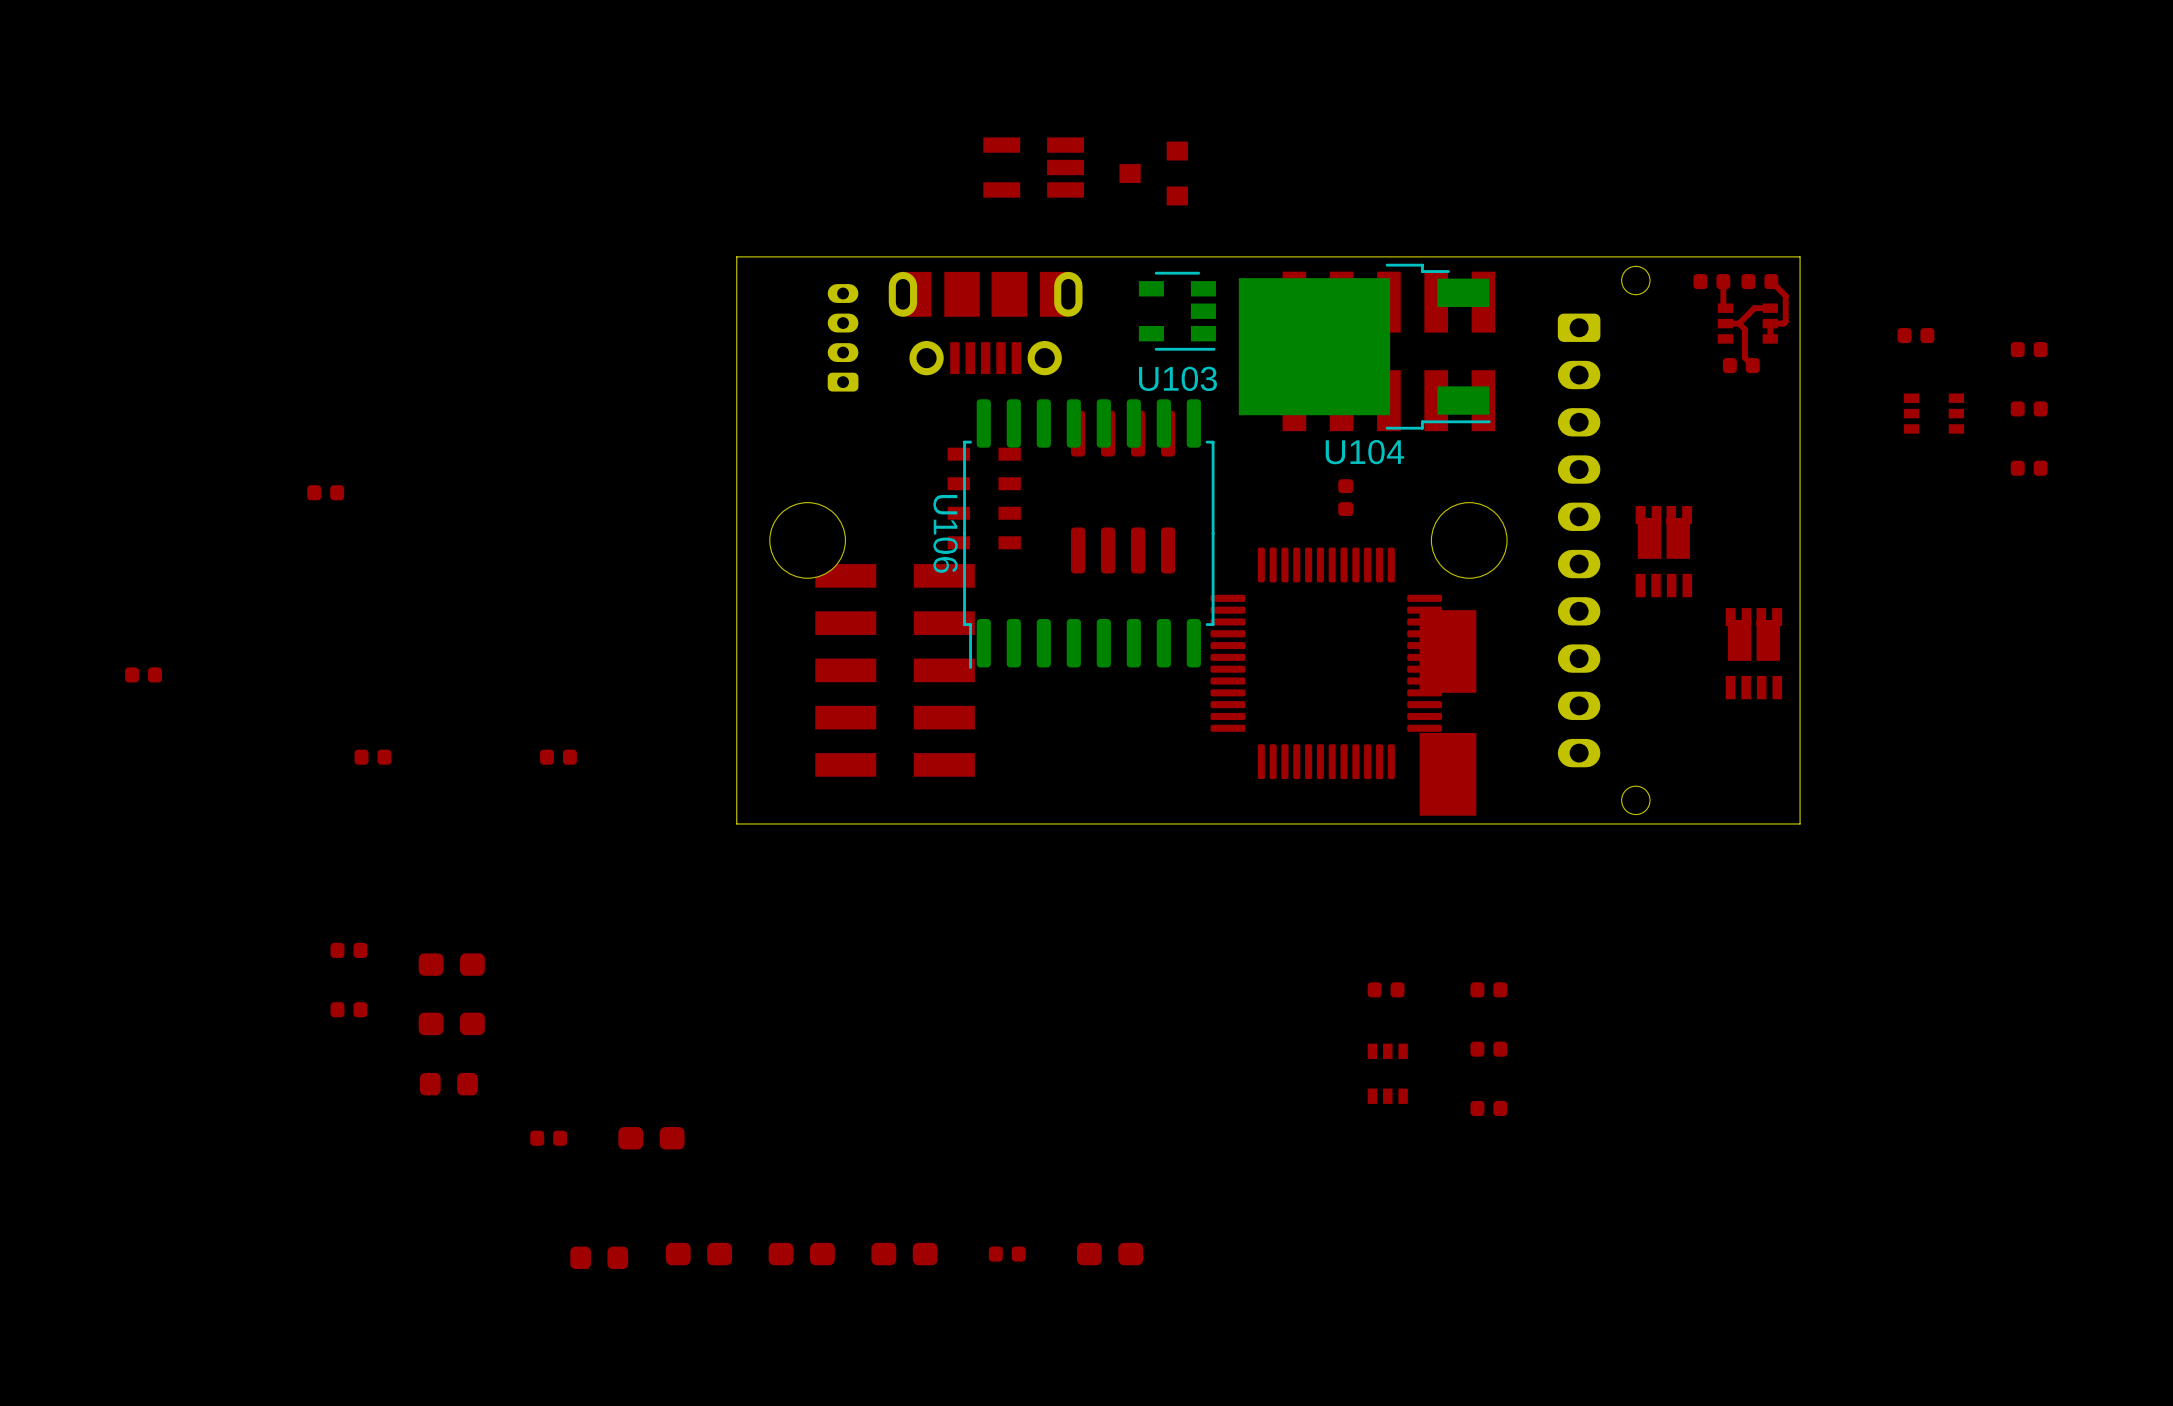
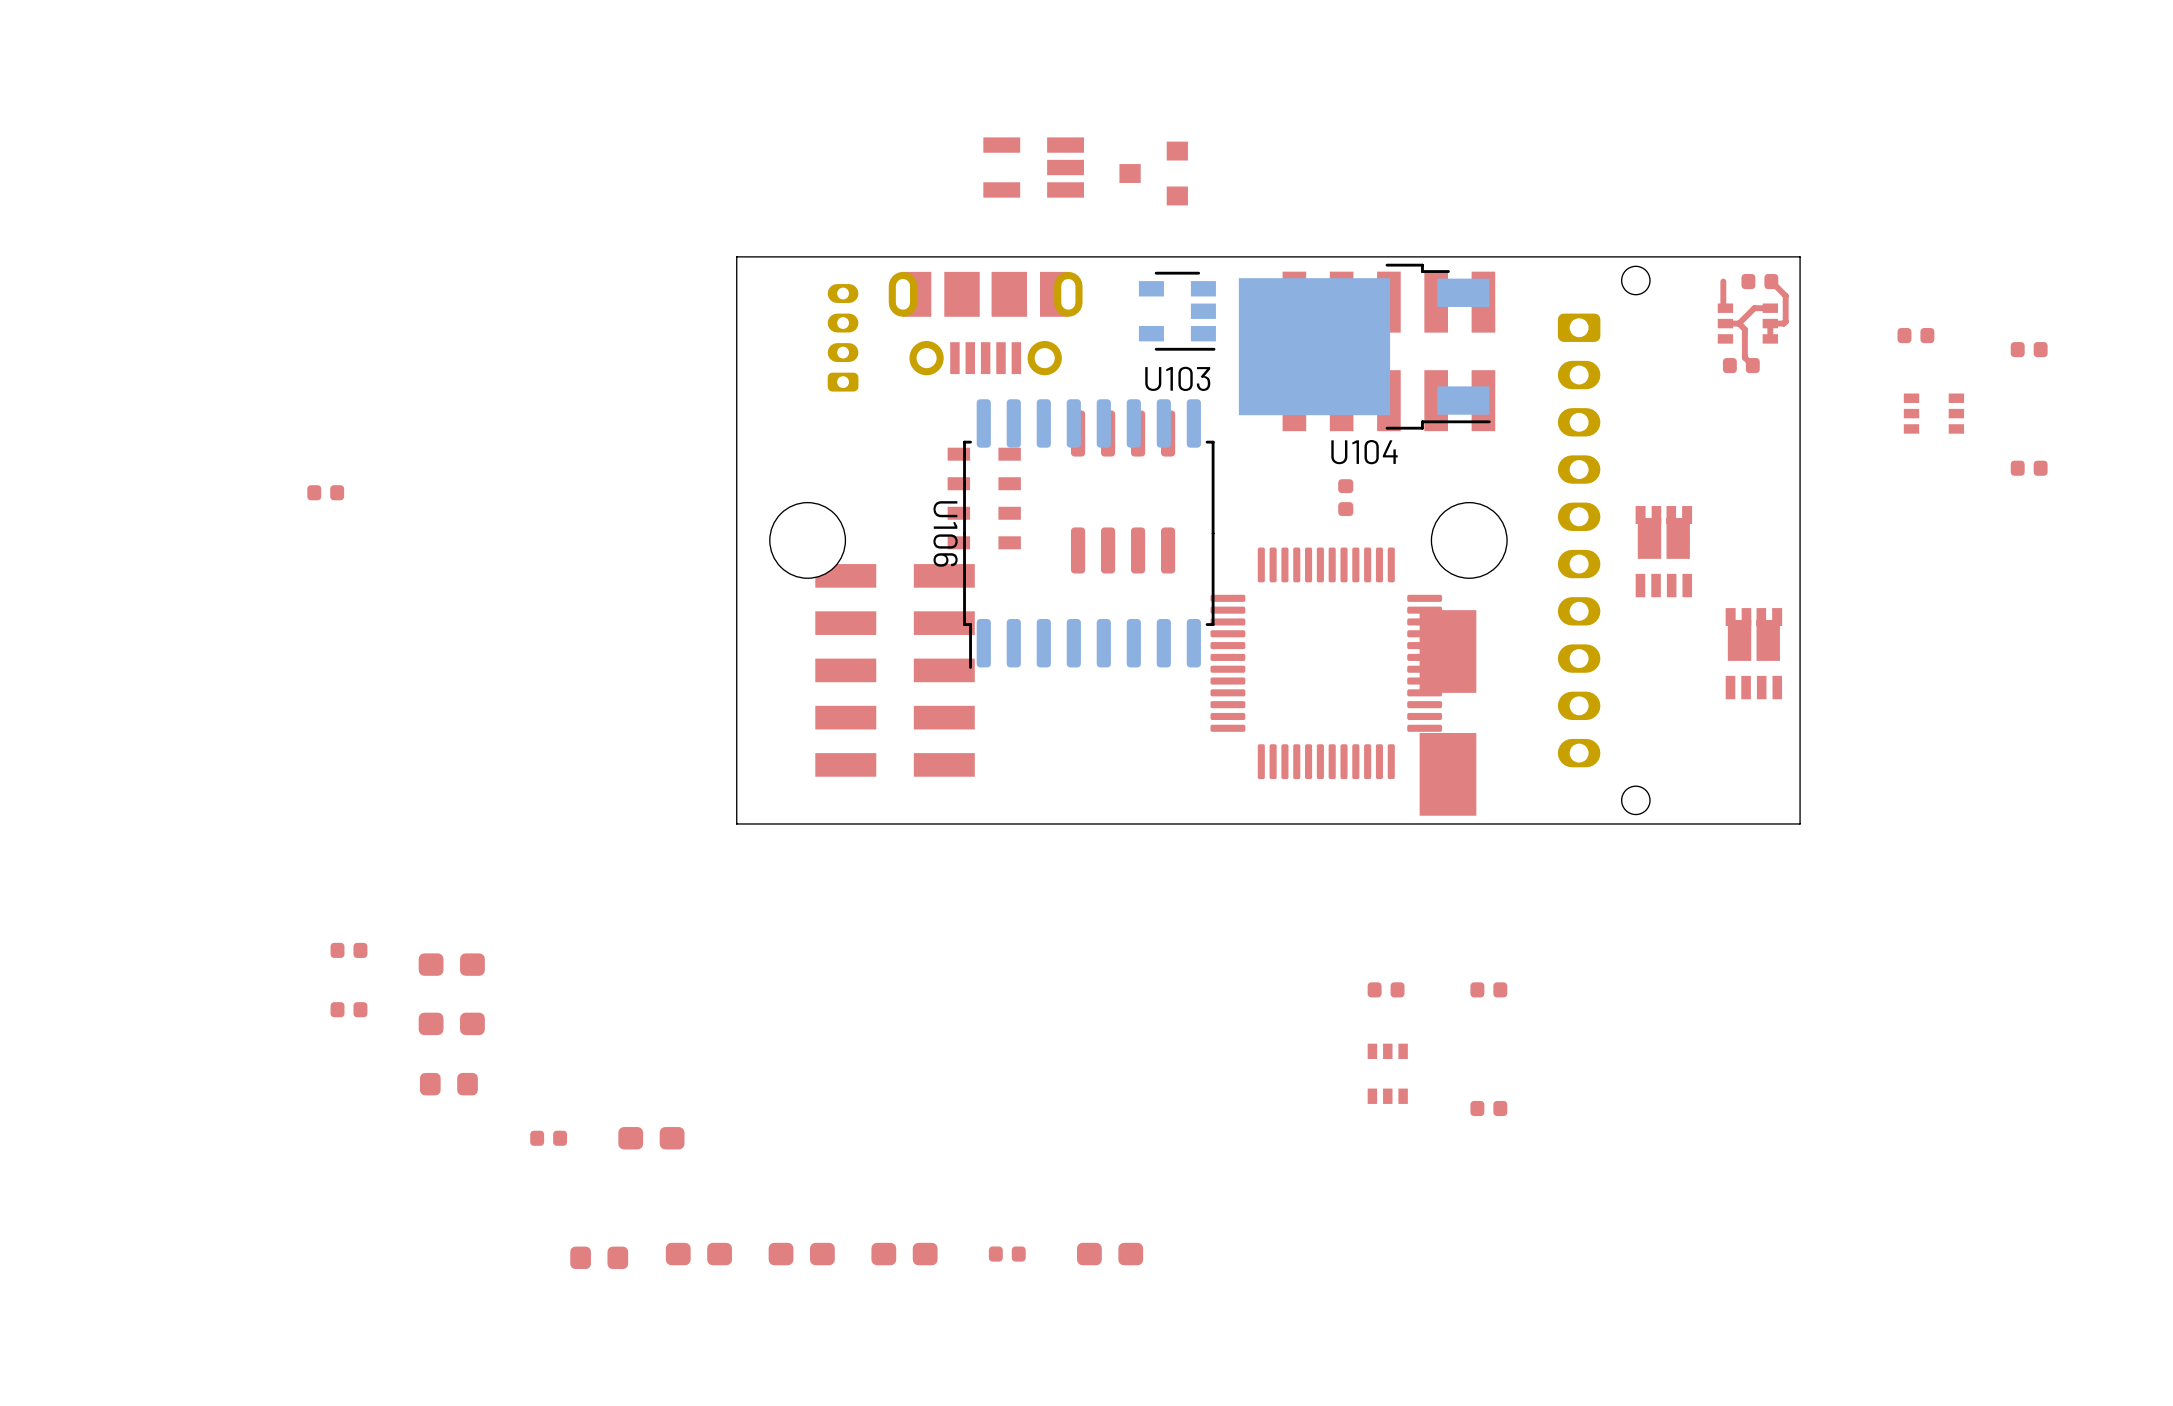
part: (1711, 281) -> none
part: (2029, 408) -> none
part: (143, 674) -> none
part: (372, 757) -> none
part: (558, 757) -> none
part: (1488, 1049) -> none

